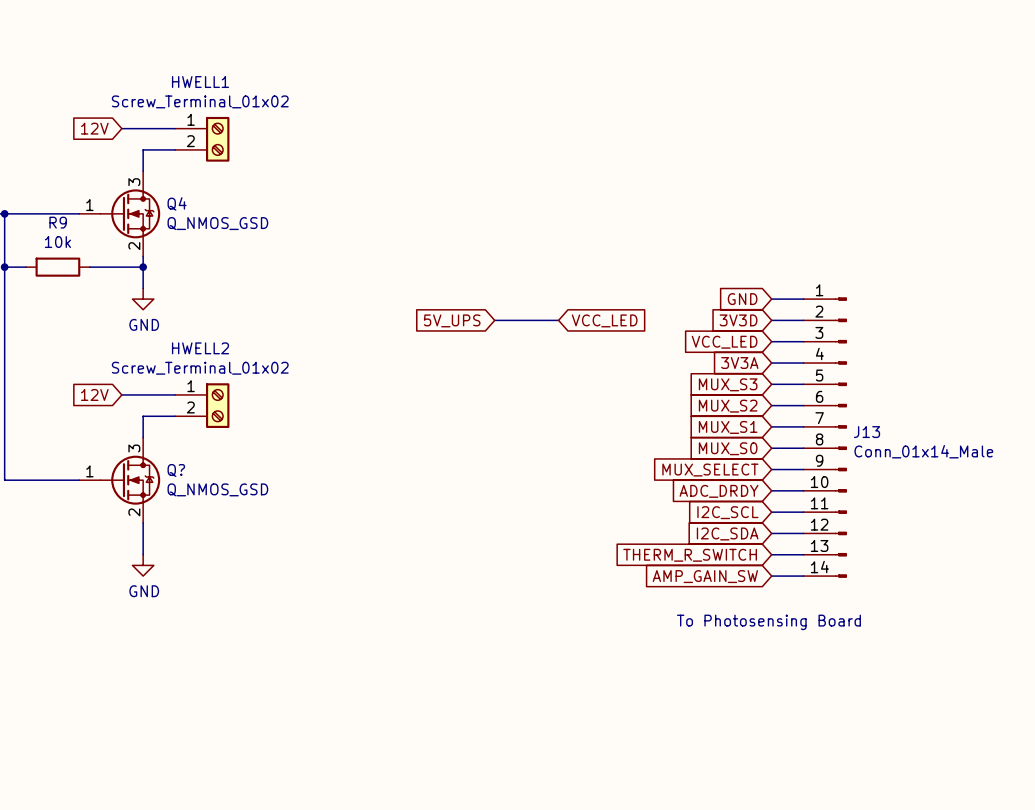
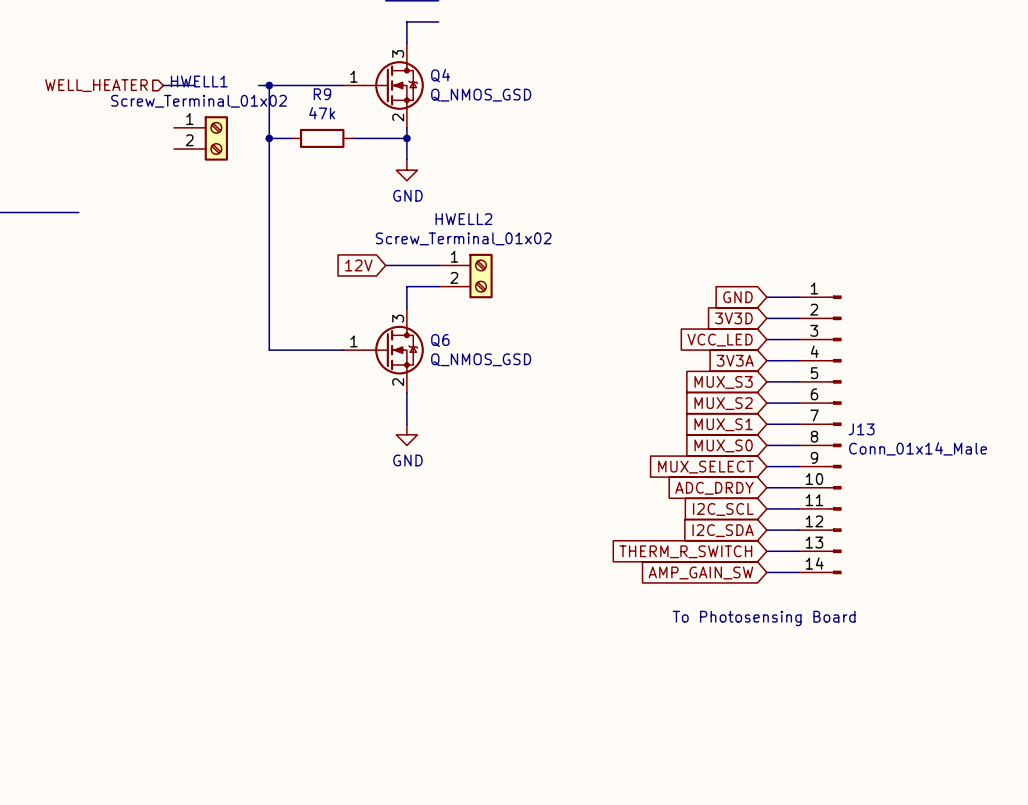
wire: none -> (385, 0) (438, 0)
wire: none -> (438, 21) (406, 21) (406, 43)
hierarchical label: none -> WELL_HEATER (96, 85)
wire: none -> (163, 85) (195, 85)
wire: none -> (258, 85) (343, 85)
wire: none -> (269, 85) (269, 350) (343, 350)
junction: none -> (269, 85)
global label: 12V (94, 128) -> none
wire: (121, 128) (175, 128) -> none
wire: none -> (406, 127) (406, 159)
wire: none -> (269, 138) (290, 138)
junction: none -> (269, 138)
wire: none -> (353, 138) (406, 138)
junction: none -> (406, 138)
wire: (175, 149) (143, 149) (143, 171) -> none
power symbol: none -> GND (406, 170)
wire: (4, 213) (4, 480) (79, 480) -> none
junction: (4, 213) -> none
Q4 position: (119, 213) -> (383, 85)
R9 value: 10k (57, 242) -> 47k (322, 113)
wire: (143, 256) (143, 288) -> none
wire: (4, 267) (25, 267) -> none
junction: (4, 267) -> none
R9 position: (57, 267) -> (322, 138)
wire: (89, 267) (143, 267) -> none
junction: (143, 267) -> none
global label: none -> 12V (358, 265)
wire: none -> (385, 265) (438, 265)
wire: none -> (438, 286) (406, 286) (406, 307)
power symbol: GND (143, 299) -> none
global label: 5V_UPS (452, 320) -> none
wire: (494, 320) (558, 320) -> none
global label: VCC_LED (604, 320) -> none
Q6: none -> Q_NMOS_GSD (383, 350)
global label: 12V (94, 394) -> none
wire: (121, 394) (175, 394) -> none
wire: none -> (406, 392) (406, 424)
HWELL2 position: (202, 405) -> (465, 276)
wire: (175, 416) (143, 416) (143, 437) -> none
power symbol: none -> GND (406, 434)
Q?: Q_NMOS_GSD (119, 480) -> none
wire: (143, 522) (143, 554) -> none
power symbol: GND (143, 565) -> none

